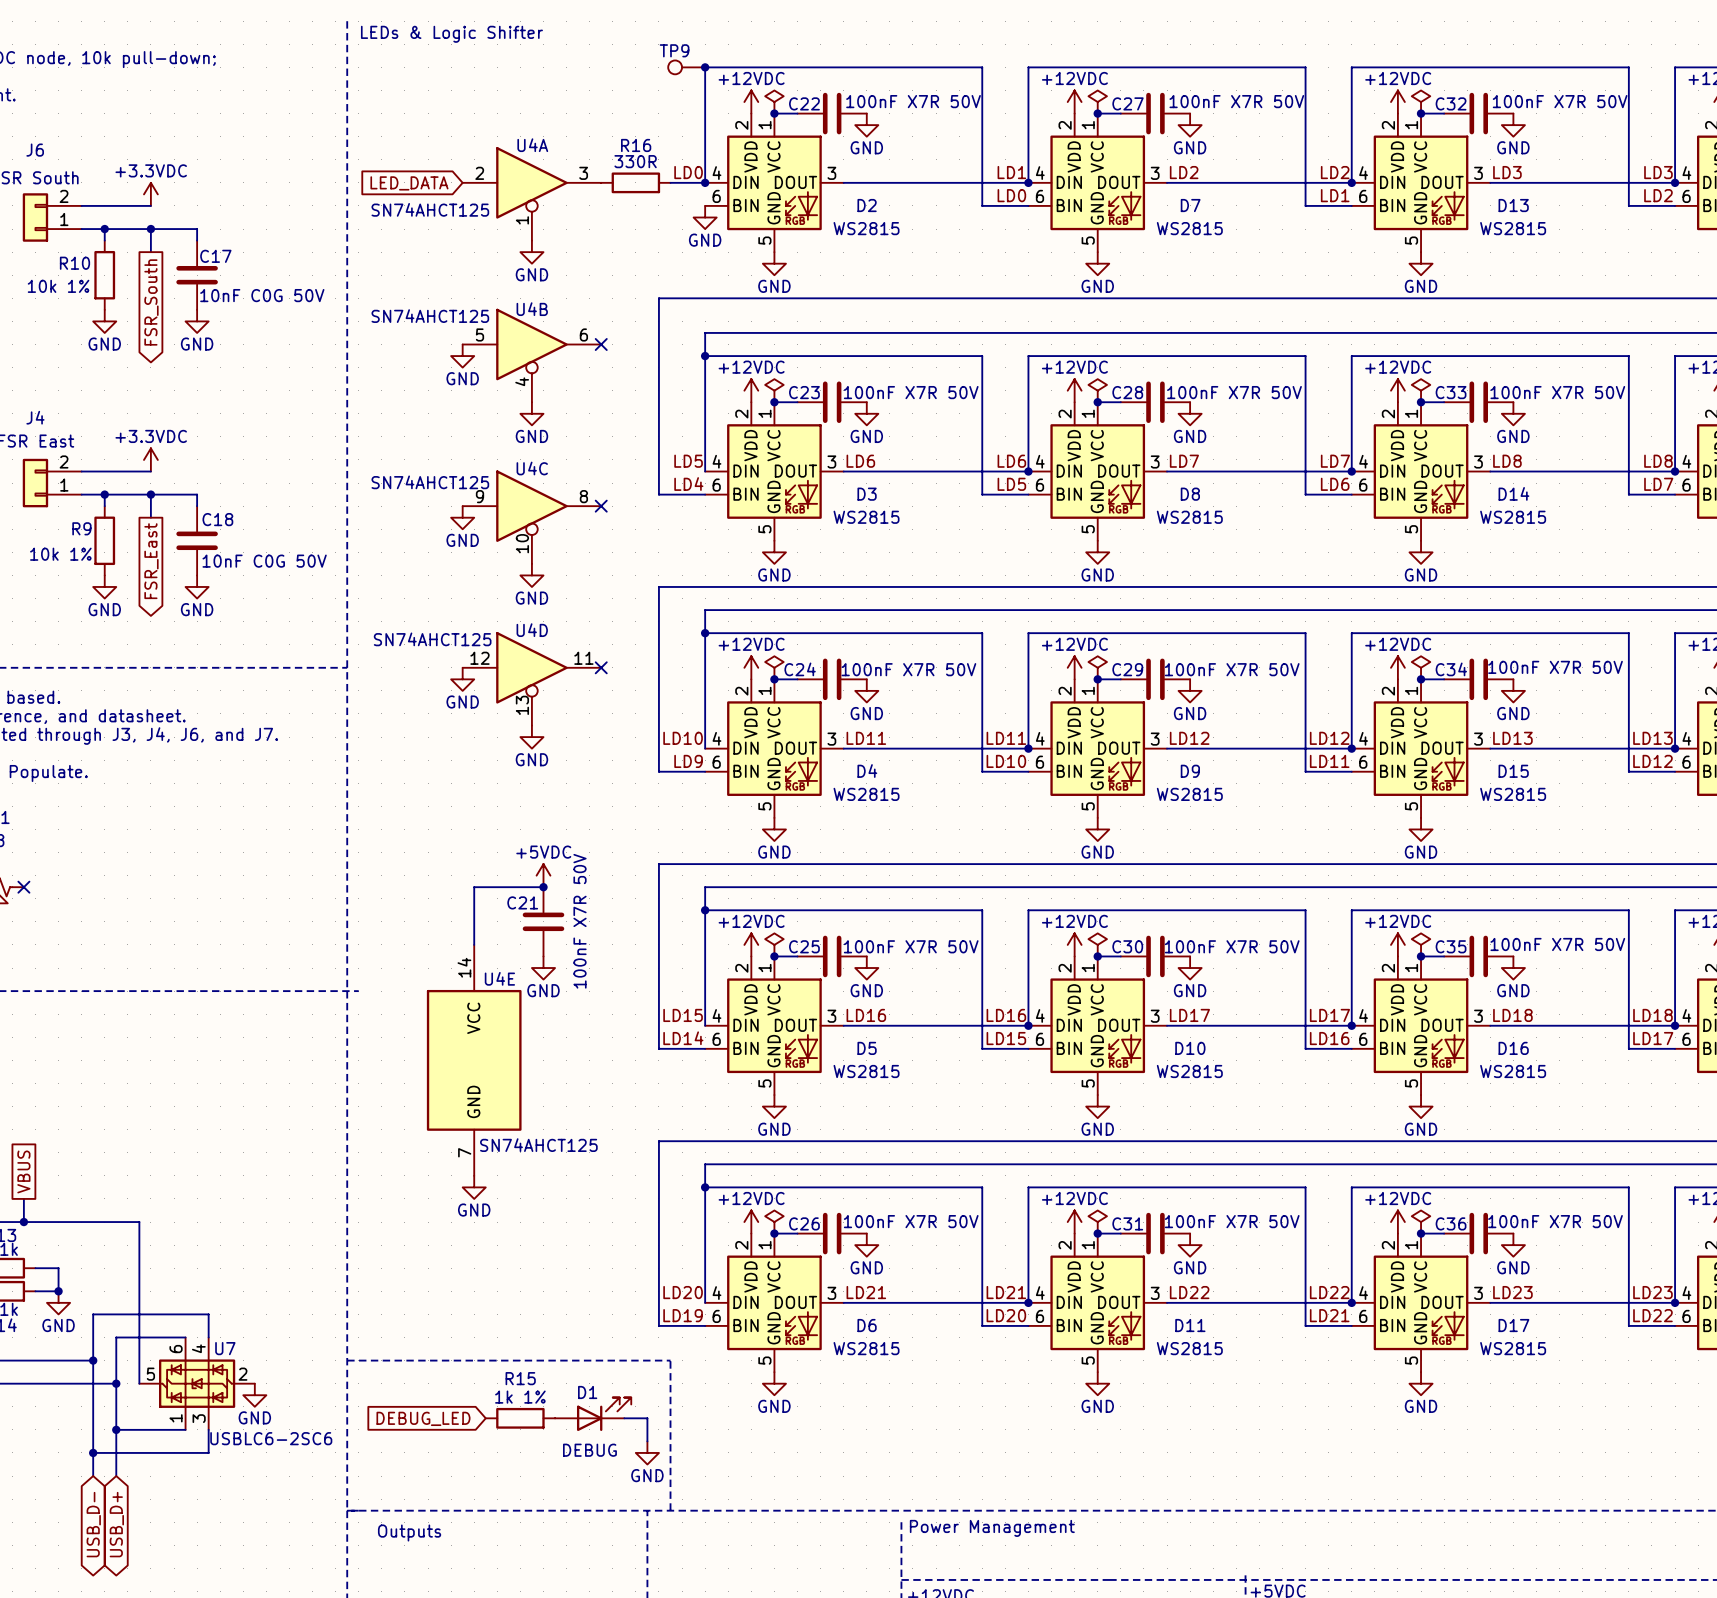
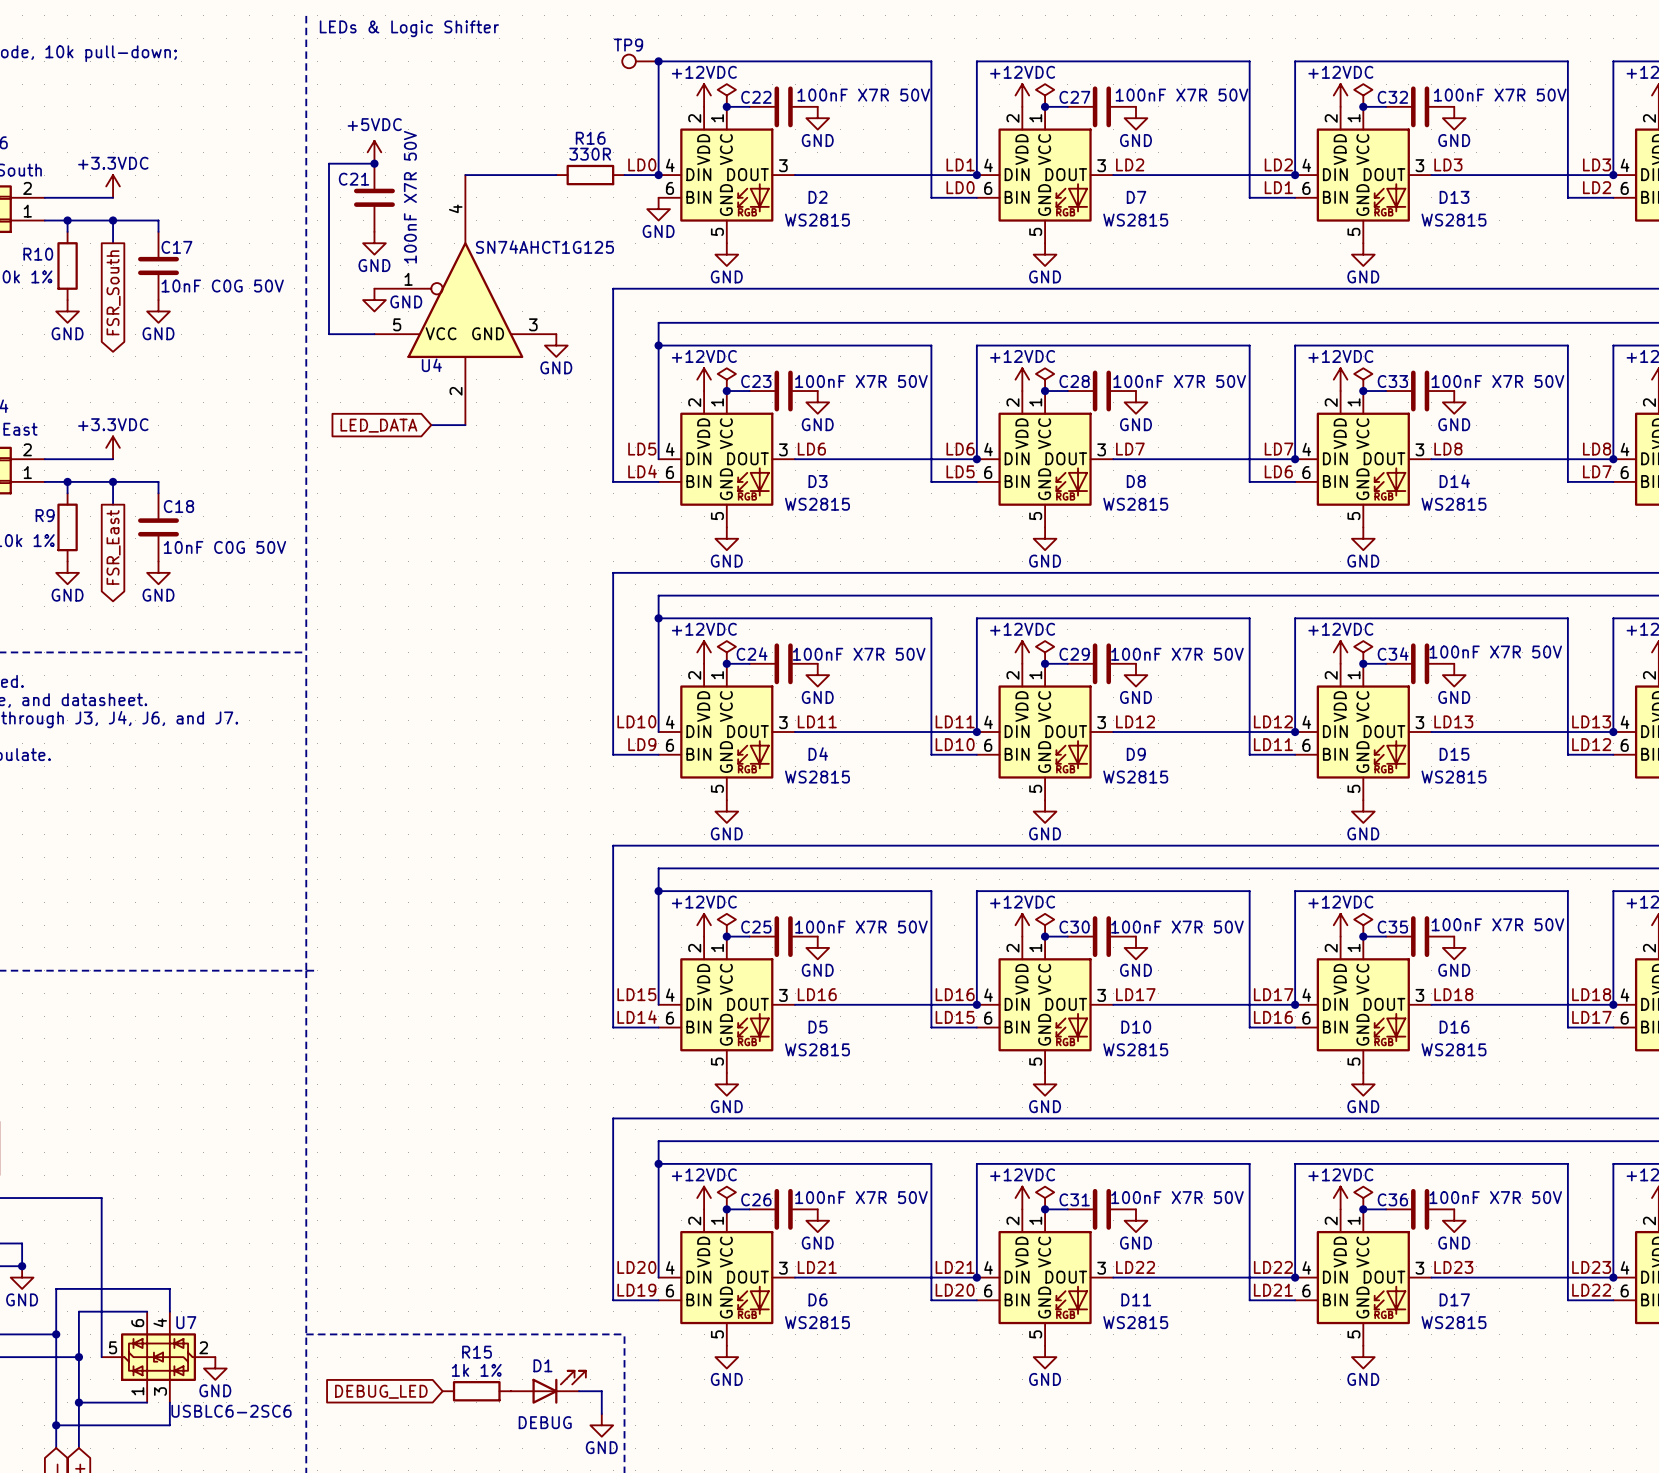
power symbol: none -> +5VDC (374, 152)
wire: none -> (374, 163) (328, 163) (328, 334) (374, 334)
junction: none -> (374, 163)
global label: LED_DATA (409, 183) -> none
U4A: SN74AHCT125 (531, 193) -> none
power symbol: none -> GND (374, 243)
power symbol: GND (531, 252) -> none
power symbol: none -> GND (374, 300)
U4: none -> SN74AHCT1G125 (465, 300)
no-connect mark: (601, 344) -> none
U4B: SN74AHCT125 (531, 355) -> none
power symbol: GND (462, 356) -> none
power symbol: none -> GND (556, 345)
power symbol: GND (531, 413) -> none
wire: none -> (431, 425) (465, 425)
global label: none -> LED_DATA (378, 425)
no-connect mark: (601, 506) -> none
power symbol: GND (462, 517) -> none
U4C: SN74AHCT125 (531, 517) -> none
power symbol: GND (531, 575) -> none
no-connect mark: (601, 667) -> none
U4D: SN74AHCT125 (531, 678) -> none
power symbol: GND (462, 679) -> none
power symbol: GND (531, 737) -> none
power symbol: +5VDC (543, 875) -> none
wire: (543, 887) (474, 887) (474, 944) -> none
junction: (543, 887) -> none
C21 position: (543, 921) -> (374, 197)
power symbol: GND (543, 968) -> none
U4E: SN74AHCT125 (474, 1060) -> none
power symbol: GND (474, 1187) -> none

